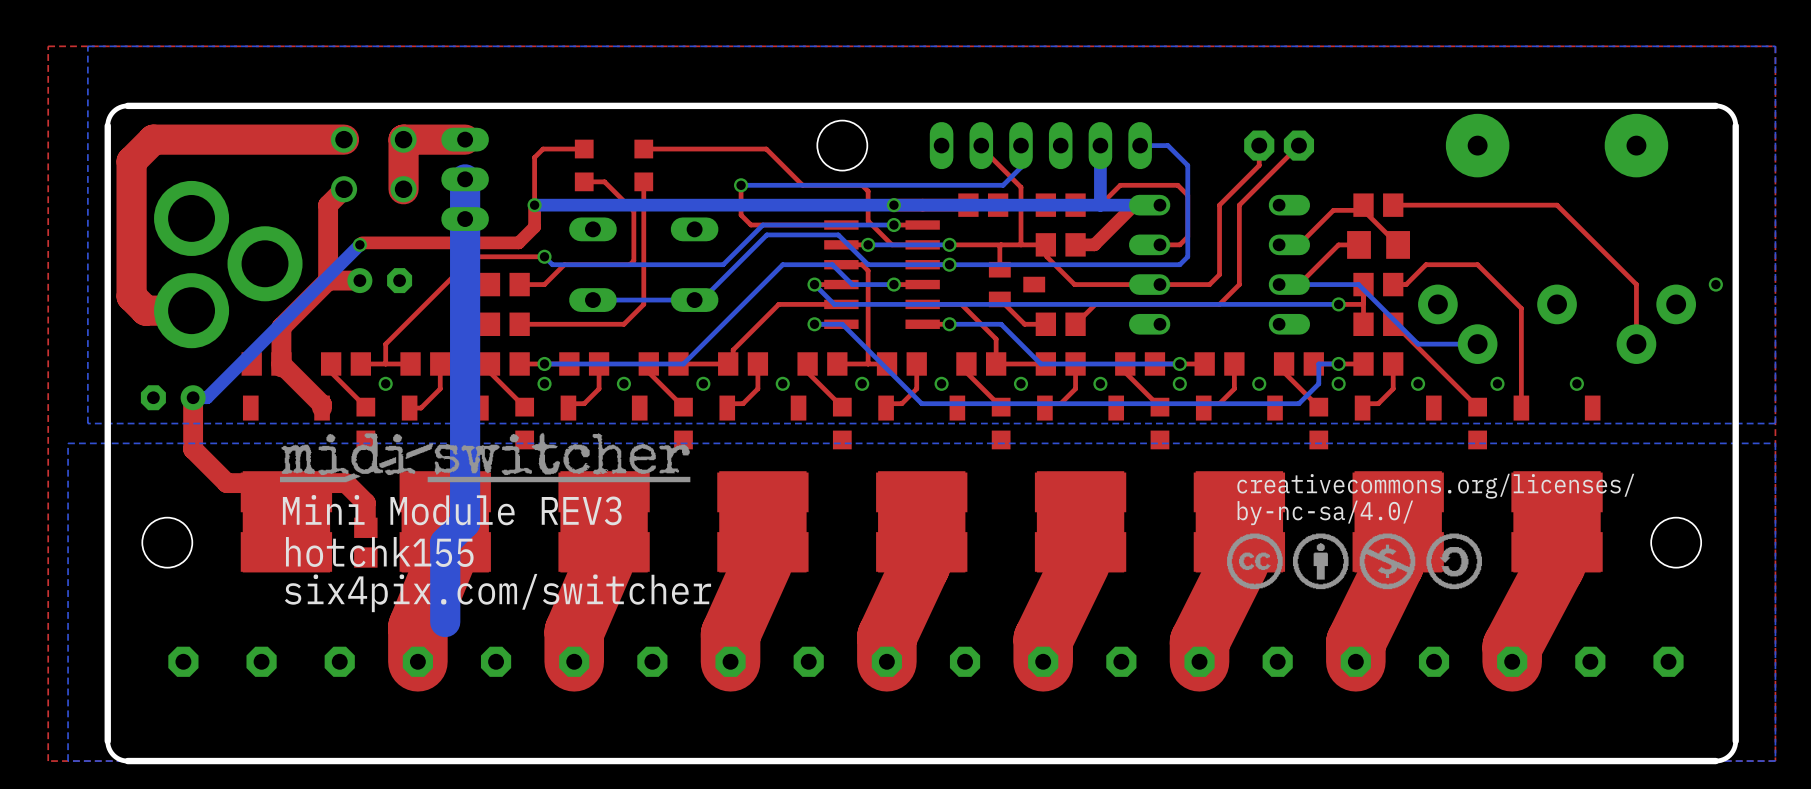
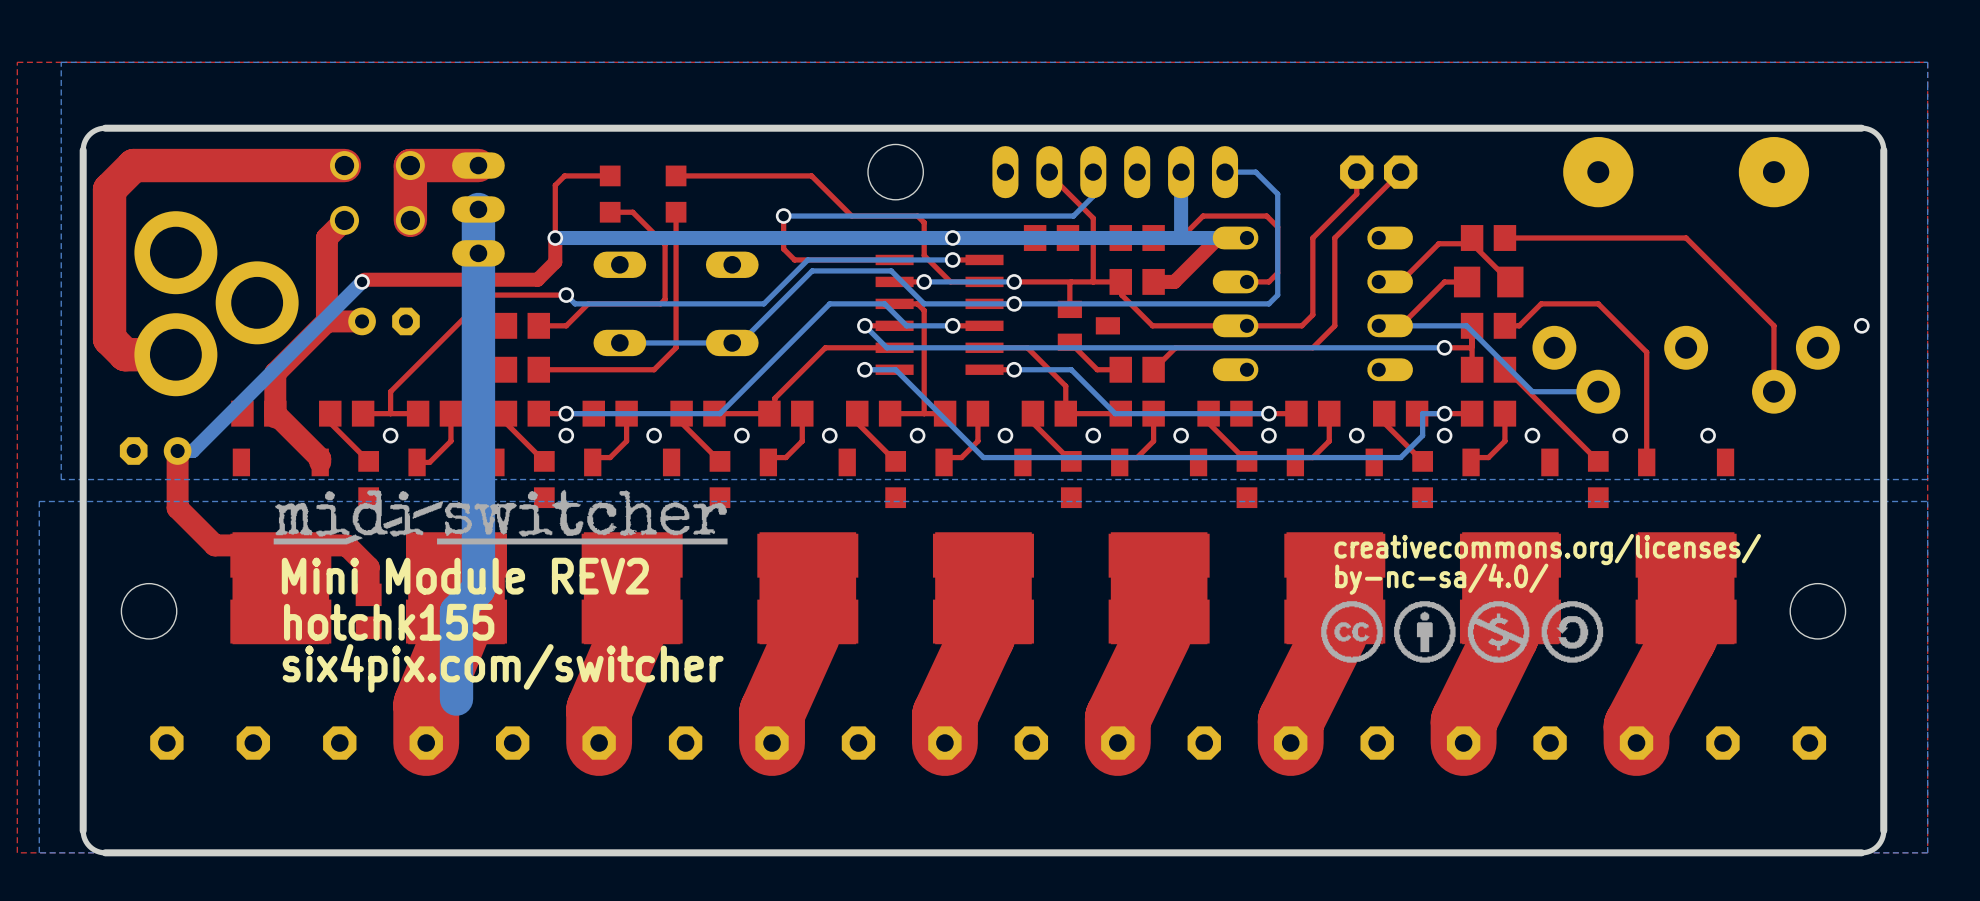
text: Mini Module REV3 (452, 510) -> Mini Module REV2 (465, 576)

